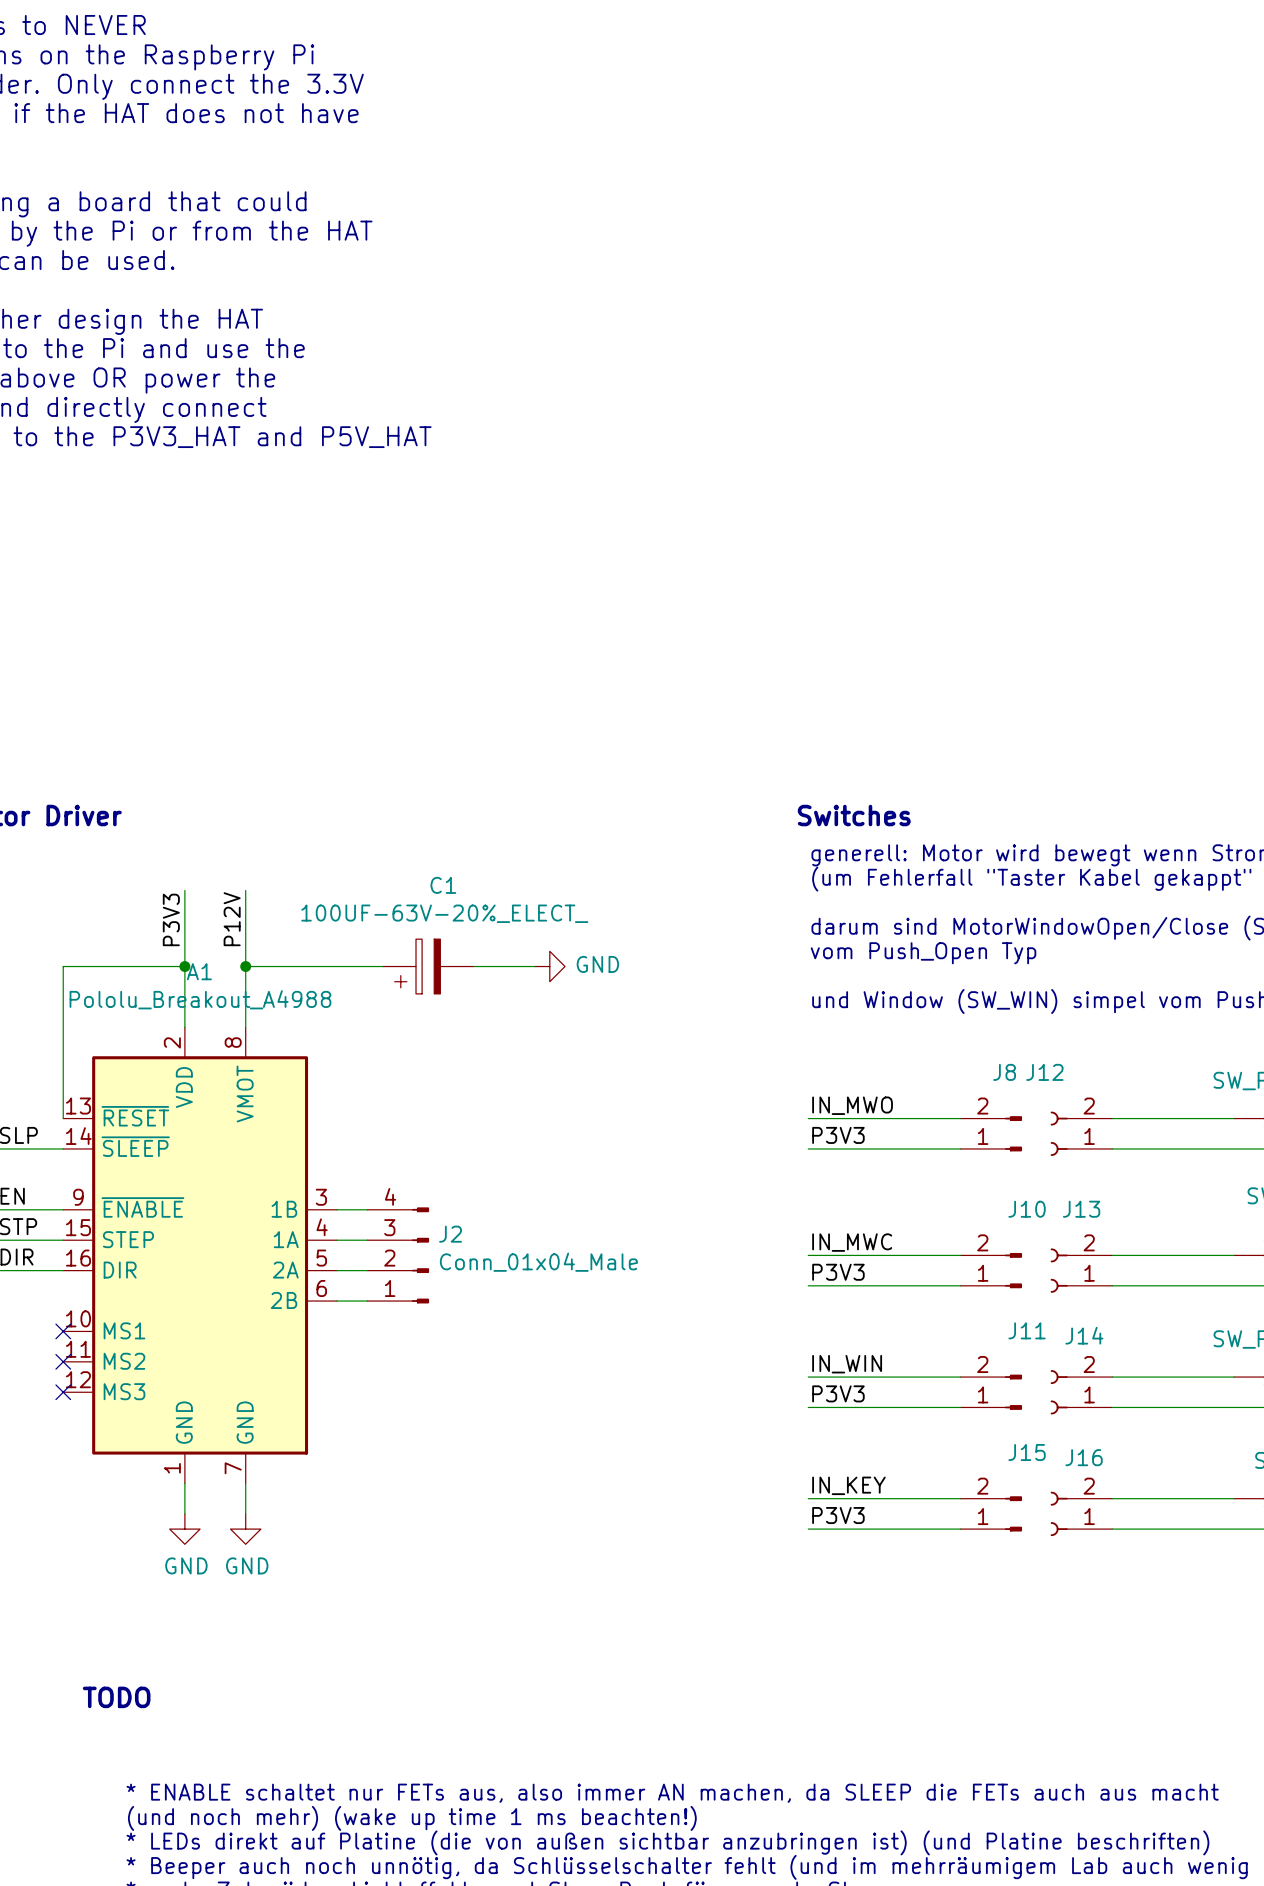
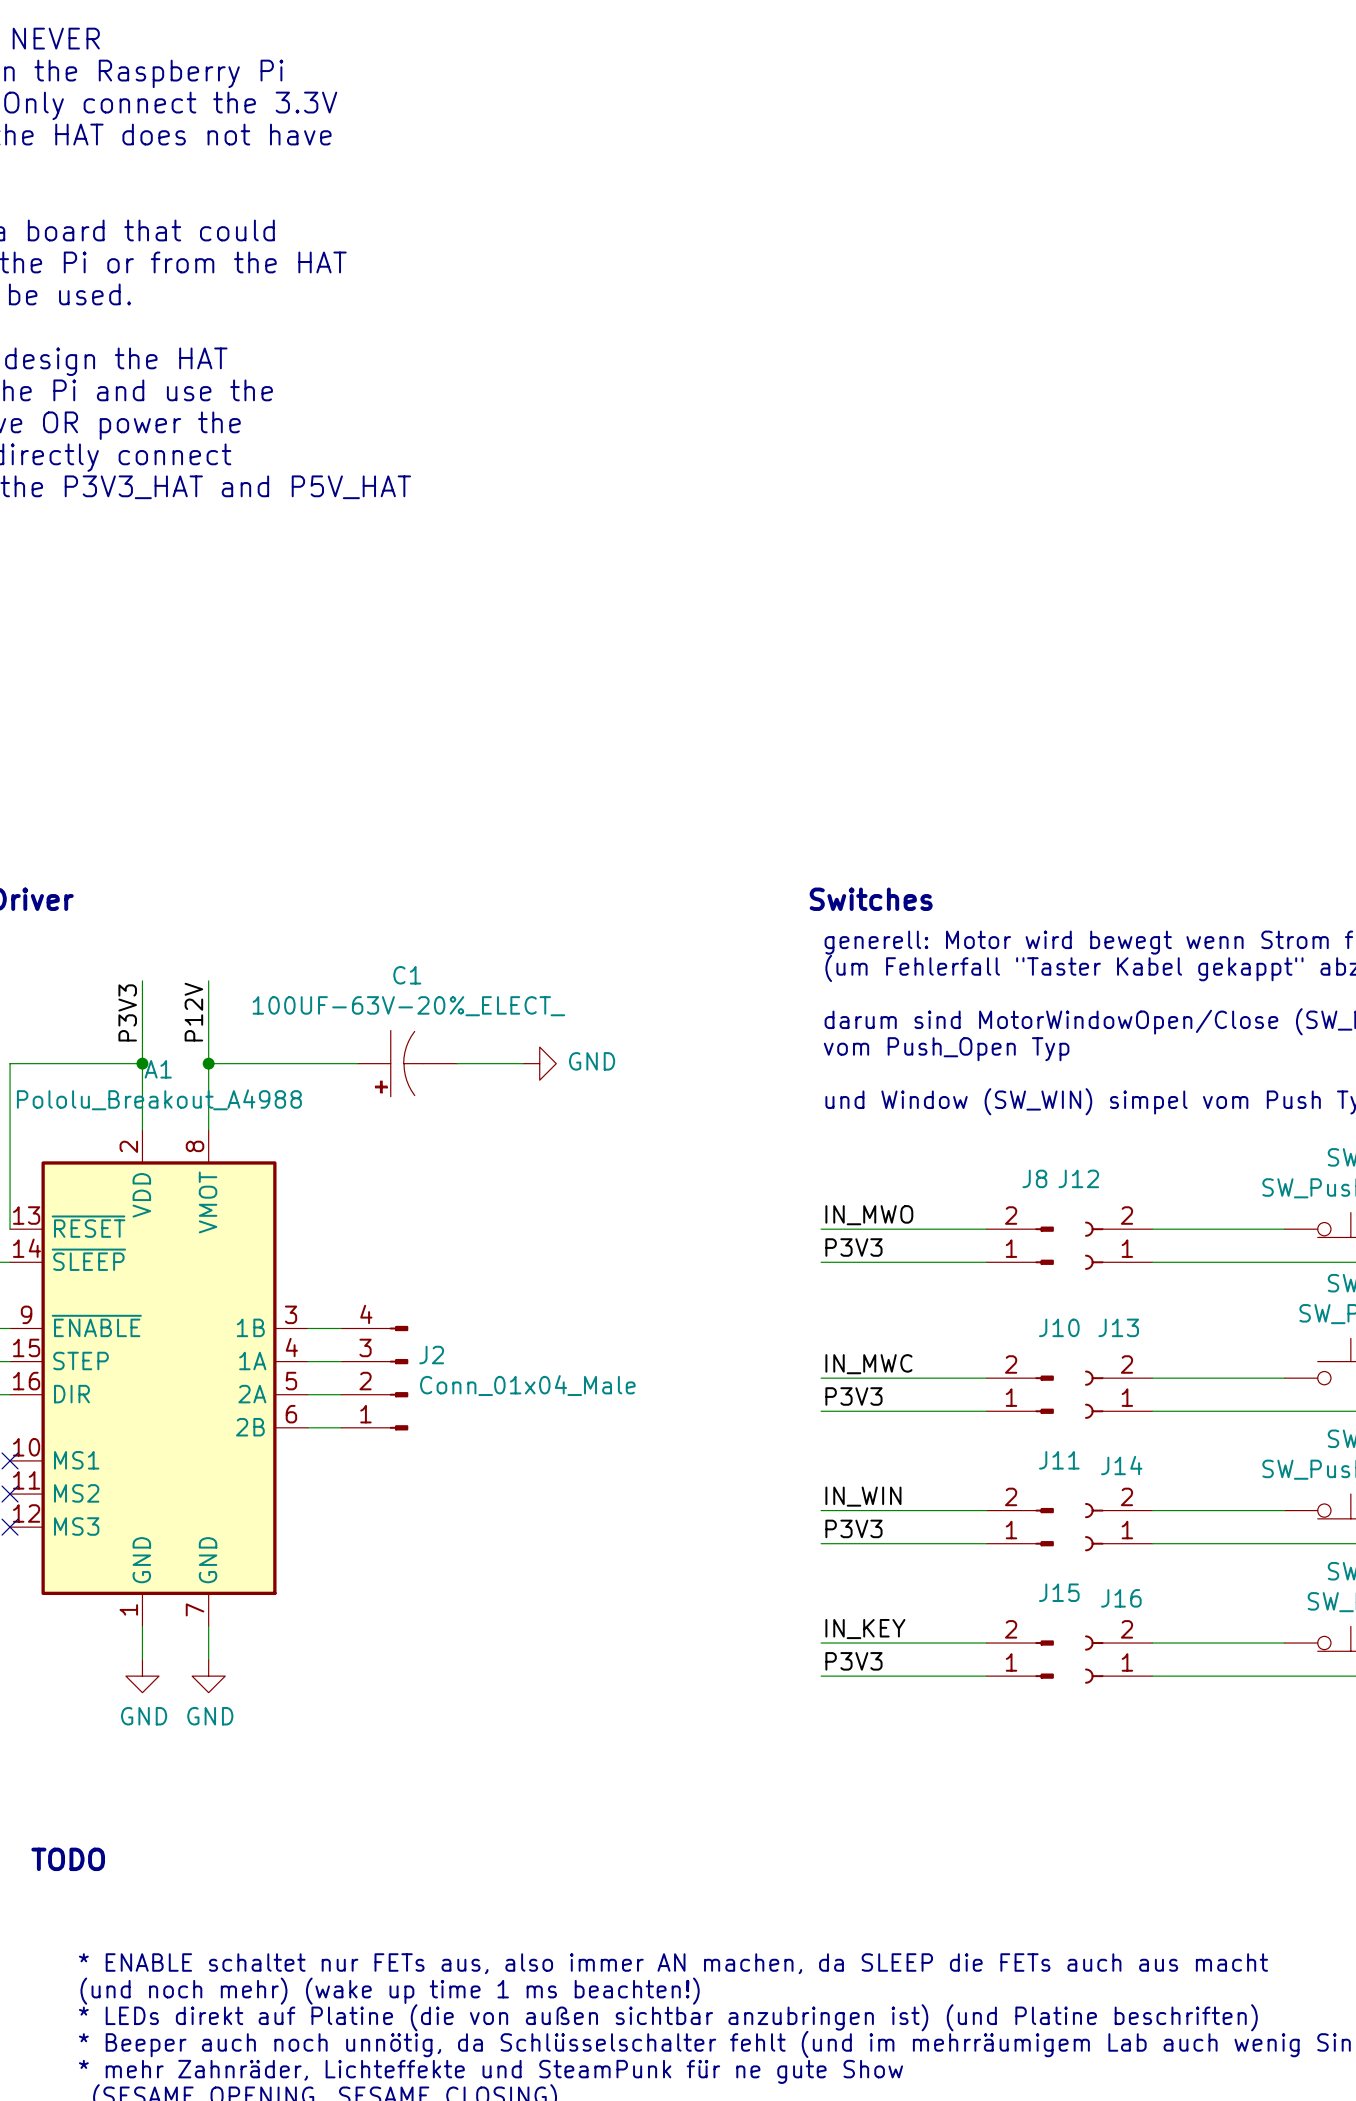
C1 symbol: [382, 939, 474, 994] -> [357, 1030, 457, 1097]

